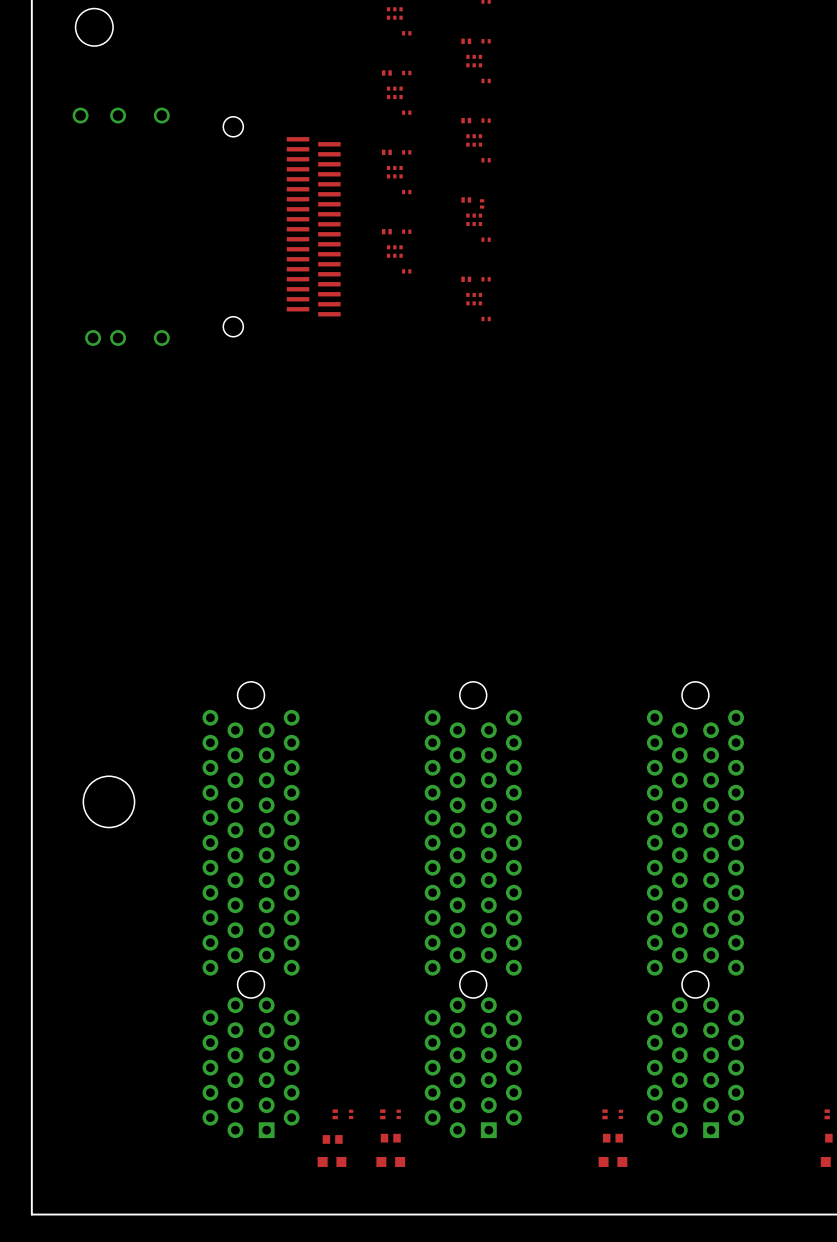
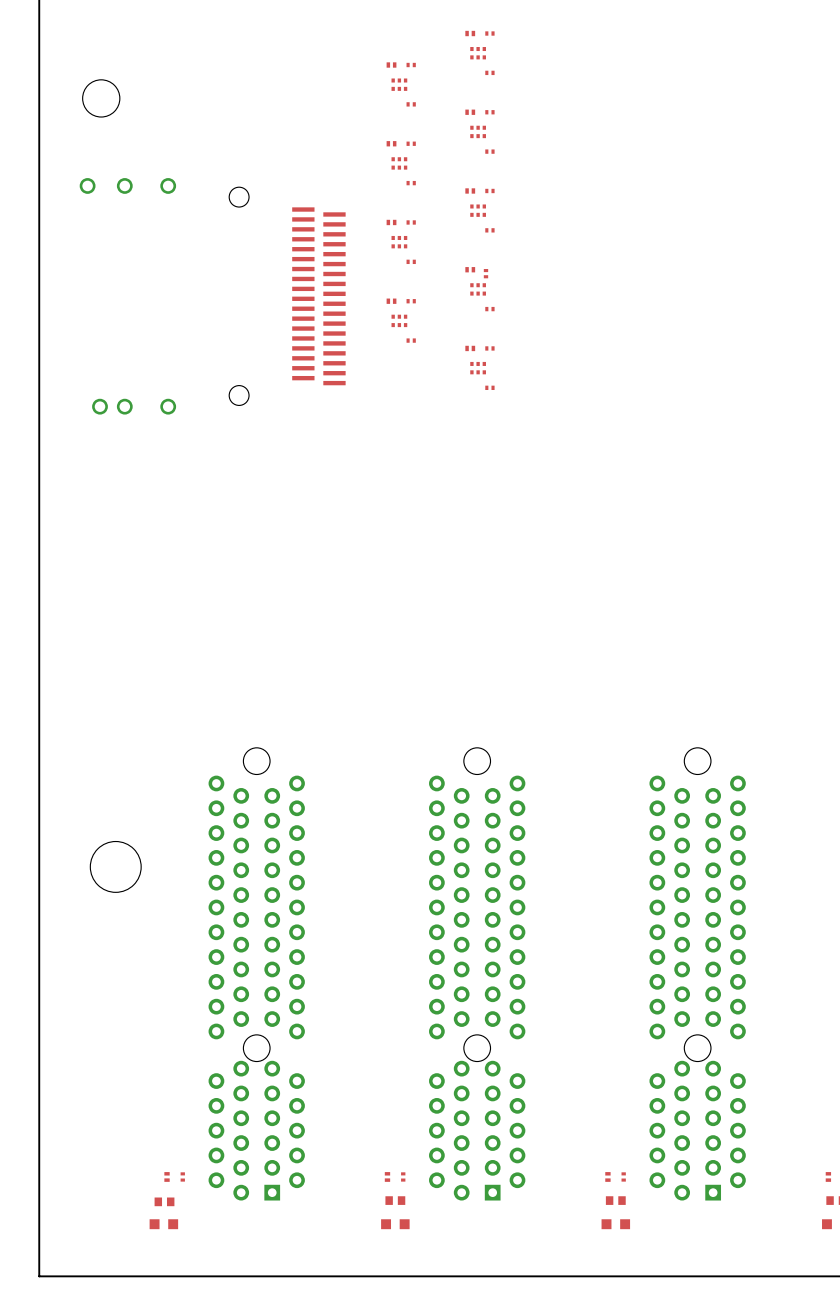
part position: (335, 1114) -> (167, 1176)
part position: (351, 1114) -> (182, 1176)
part position: (332, 1139) -> (164, 1201)
part position: (332, 1161) -> (163, 1224)

